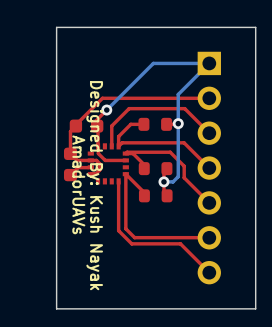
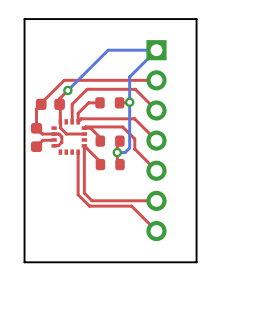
text: AmadorUAVs (78, 184) -> none
text: Designed By: Kush Nayak (94, 185) -> none

